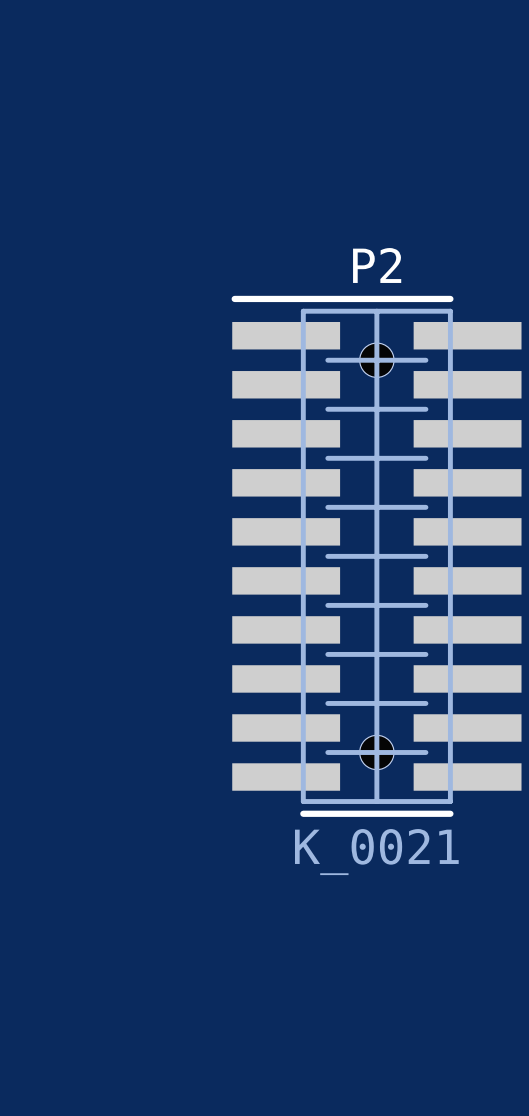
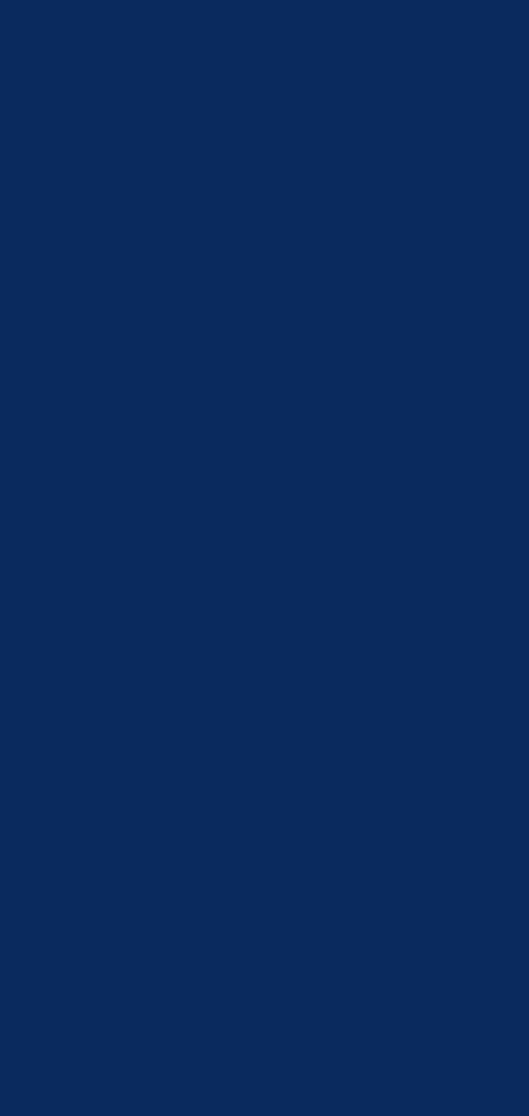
P2: K_0021 (376, 556) -> none

